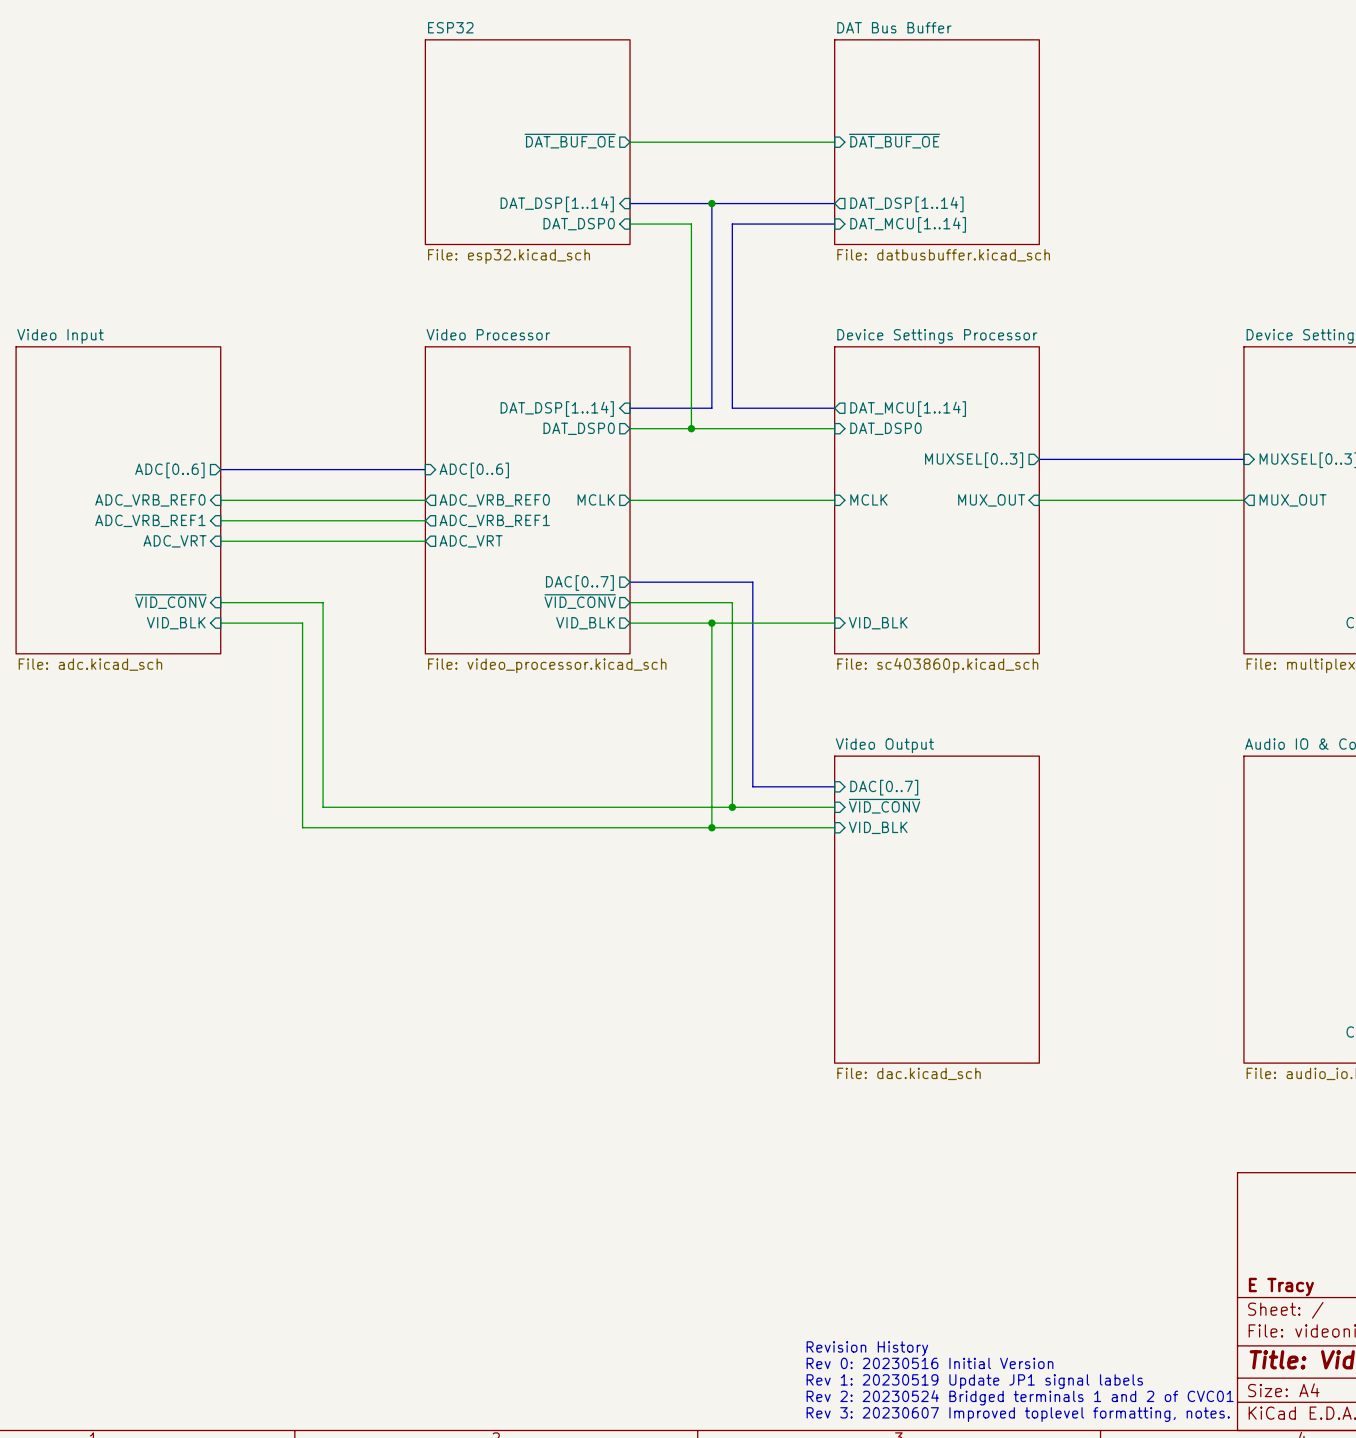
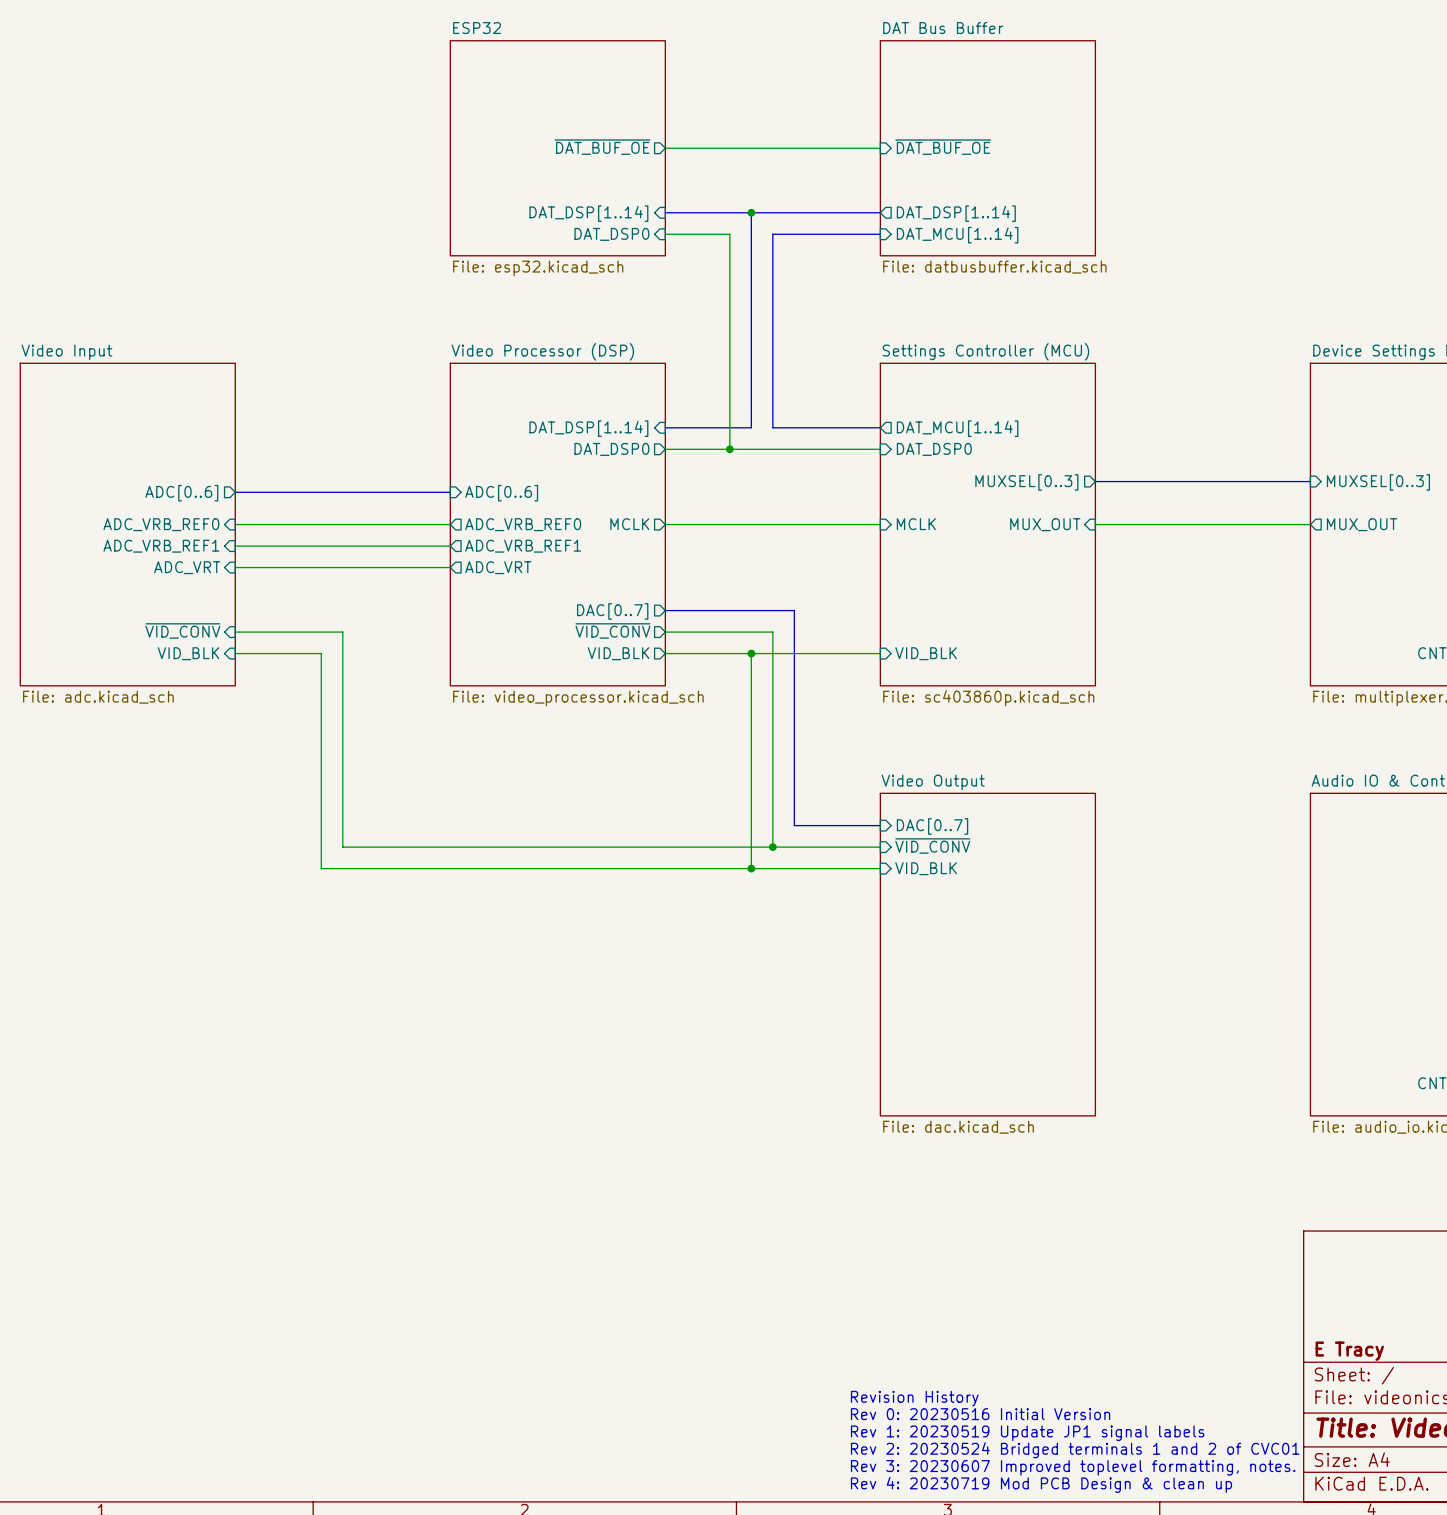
sheet Video Processor name: Video Processor (488, 334) -> Video Processor (DSP) (542, 351)
sheet Device Settings Processor name: Device Settings Processor (937, 336) -> Settings Controller (MCU) (985, 351)
text: none -> Revision History (914, 1398)
text: Revision History (867, 1348) -> Rev 0: 20230516 Initial Version (980, 1414)
text: Rev 0: 20230516 Initial Version (930, 1363) -> Rev 1: 20230519 Update JP1 signal labels (1027, 1433)
text: Rev 1: 20230519 Update JP1 signal labels (974, 1381) -> Rev 2: 20230524 Bridged terminals 1 and 2 of CVC01 (1075, 1450)
text: Rev 2: 20230524 Bridged terminals 1 and 2 of CVC01 (1020, 1397) -> Rev 3: 20230607 Improved toplevel formatting, notes. (1073, 1467)
text: Rev 3: 20230607 Improved toplevel formatting, notes. (1018, 1414) -> Rev 4: 20230719 Mod PCB Design & clean up (1041, 1484)

